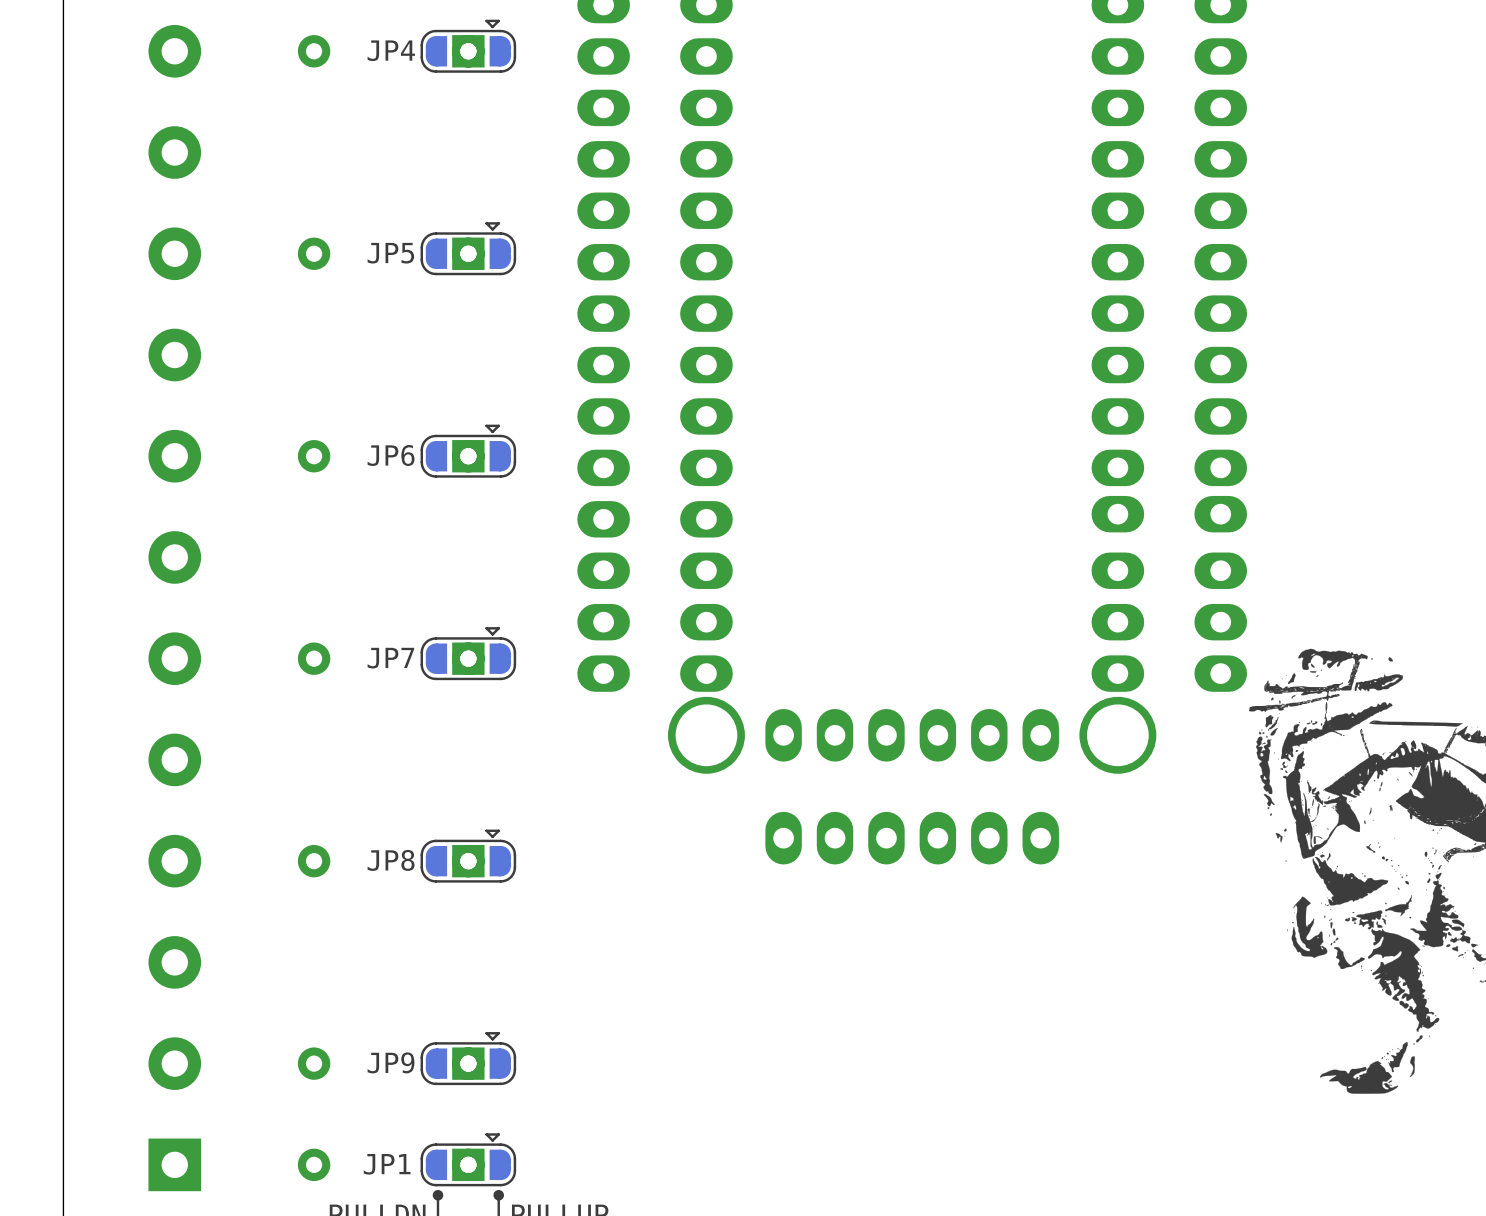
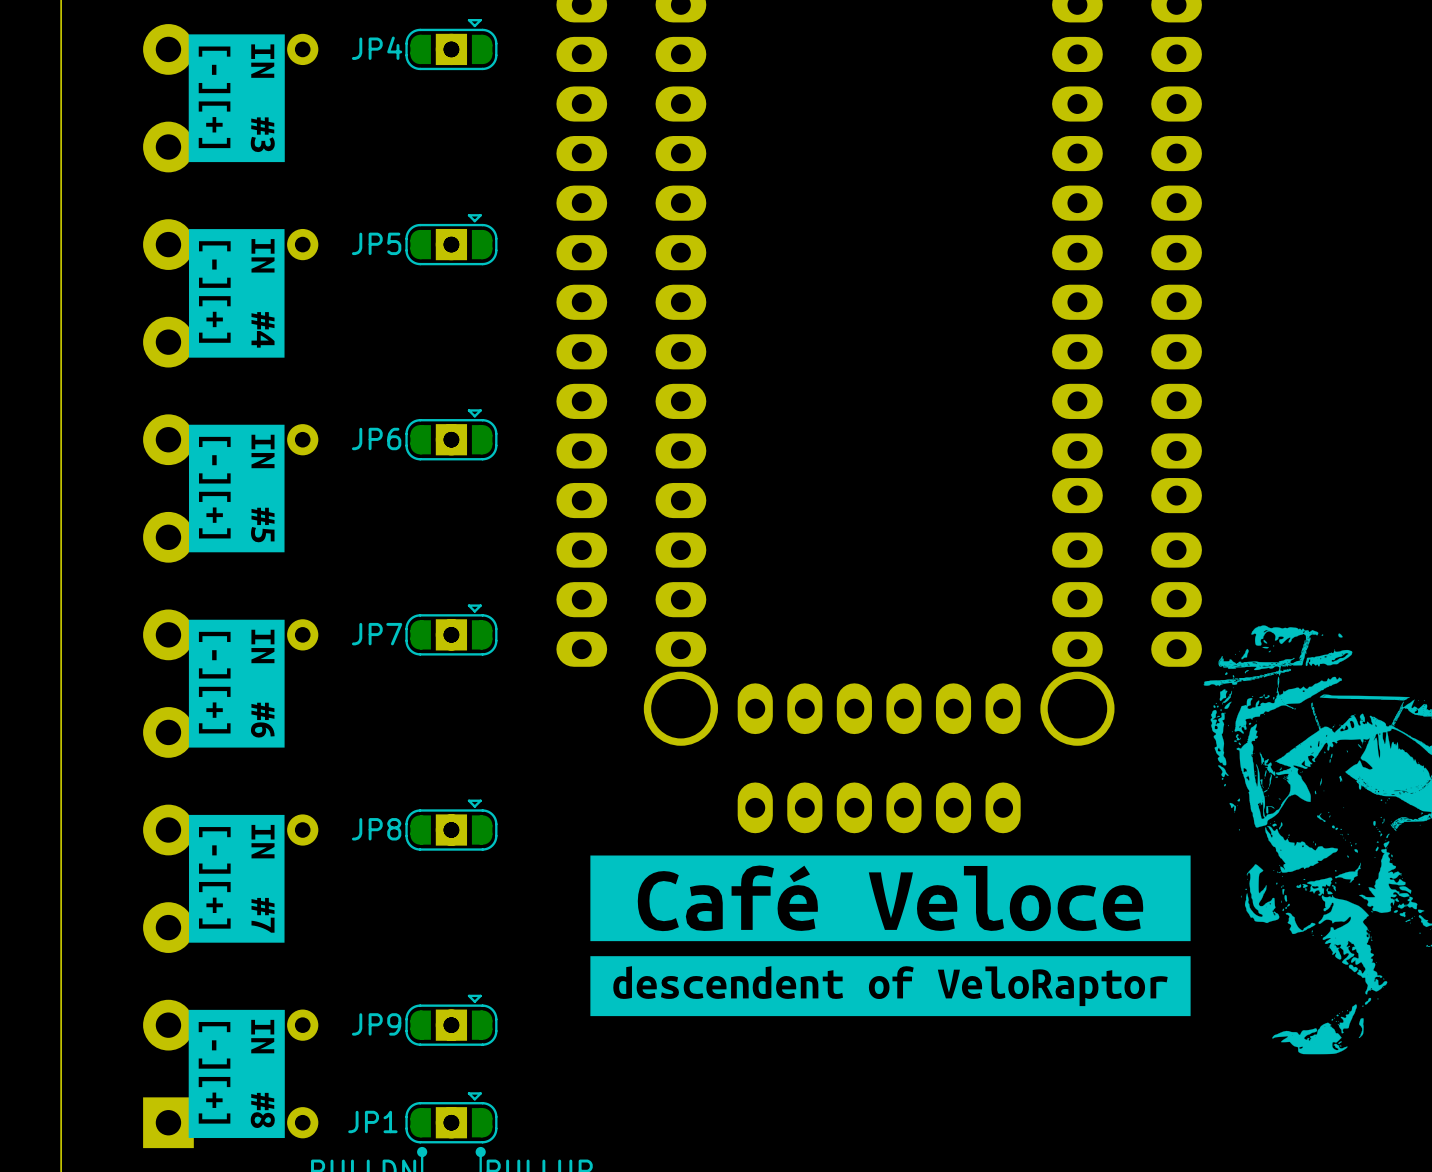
drawing: none -> [188, 34, 285, 163]
drawing: none -> [188, 229, 285, 358]
drawing: none -> [188, 424, 285, 553]
drawing: none -> [188, 619, 285, 748]
drawing: none -> [188, 814, 285, 943]
drawing: none -> [590, 855, 1191, 1017]
drawing: none -> [188, 1009, 285, 1139]

